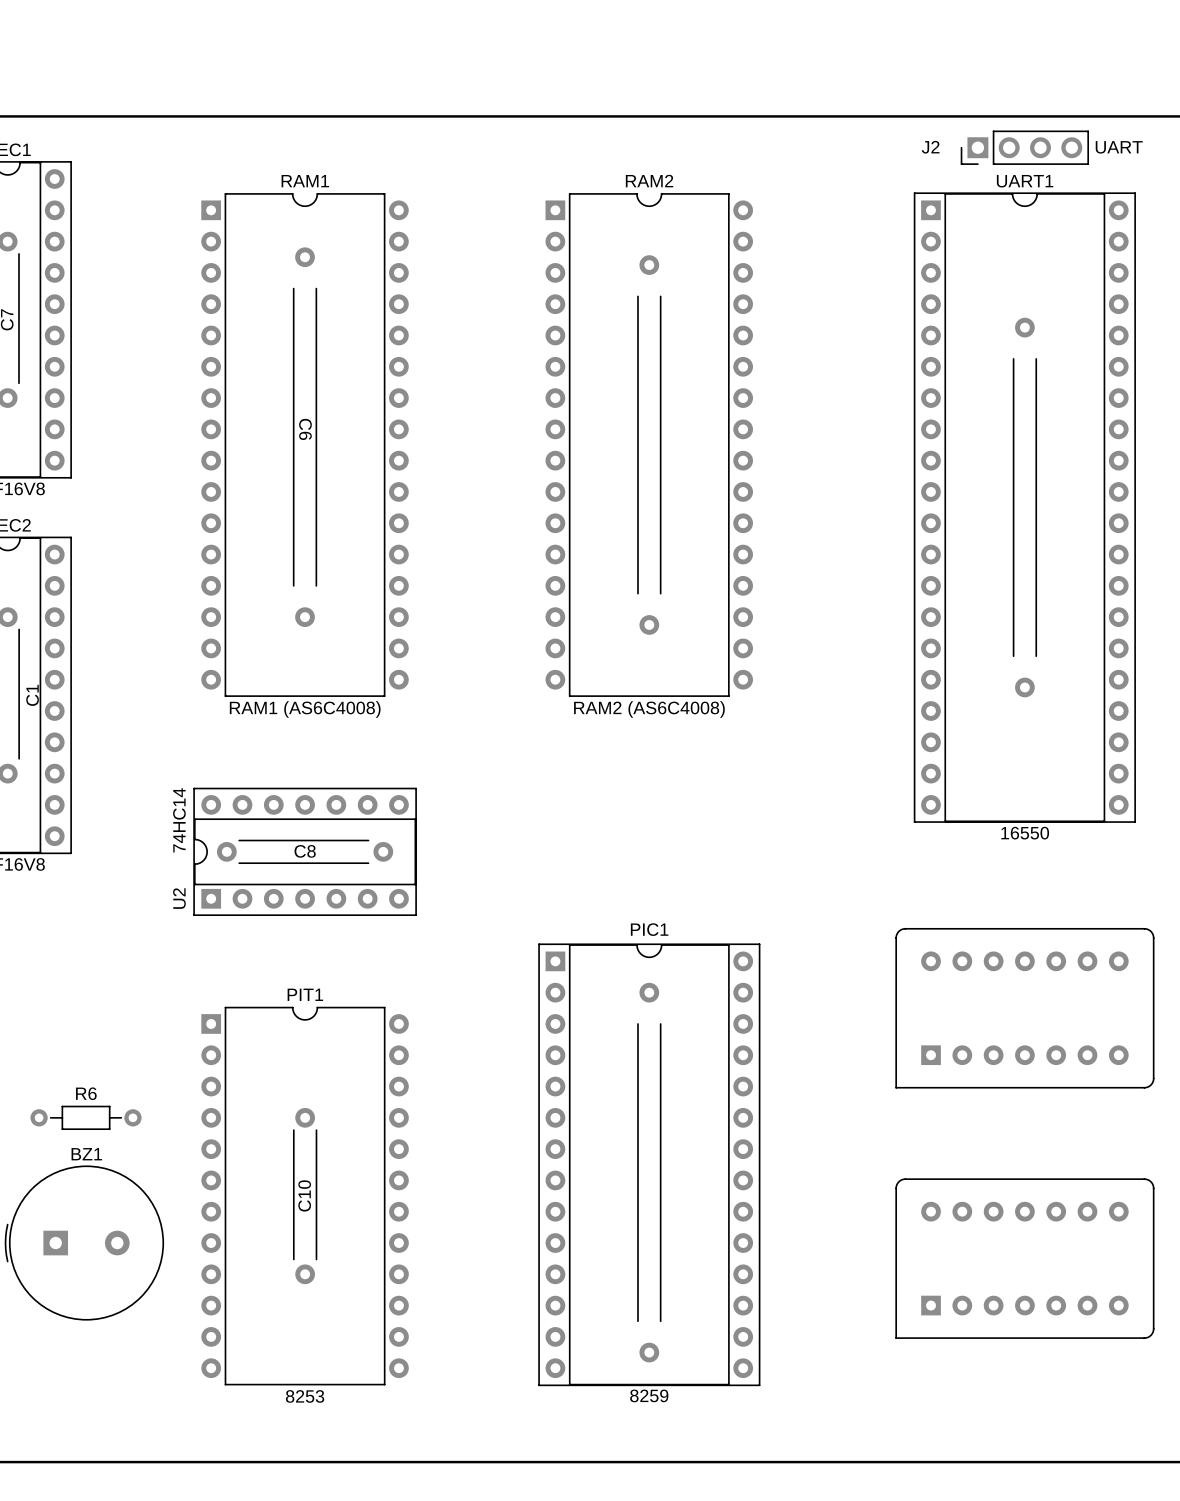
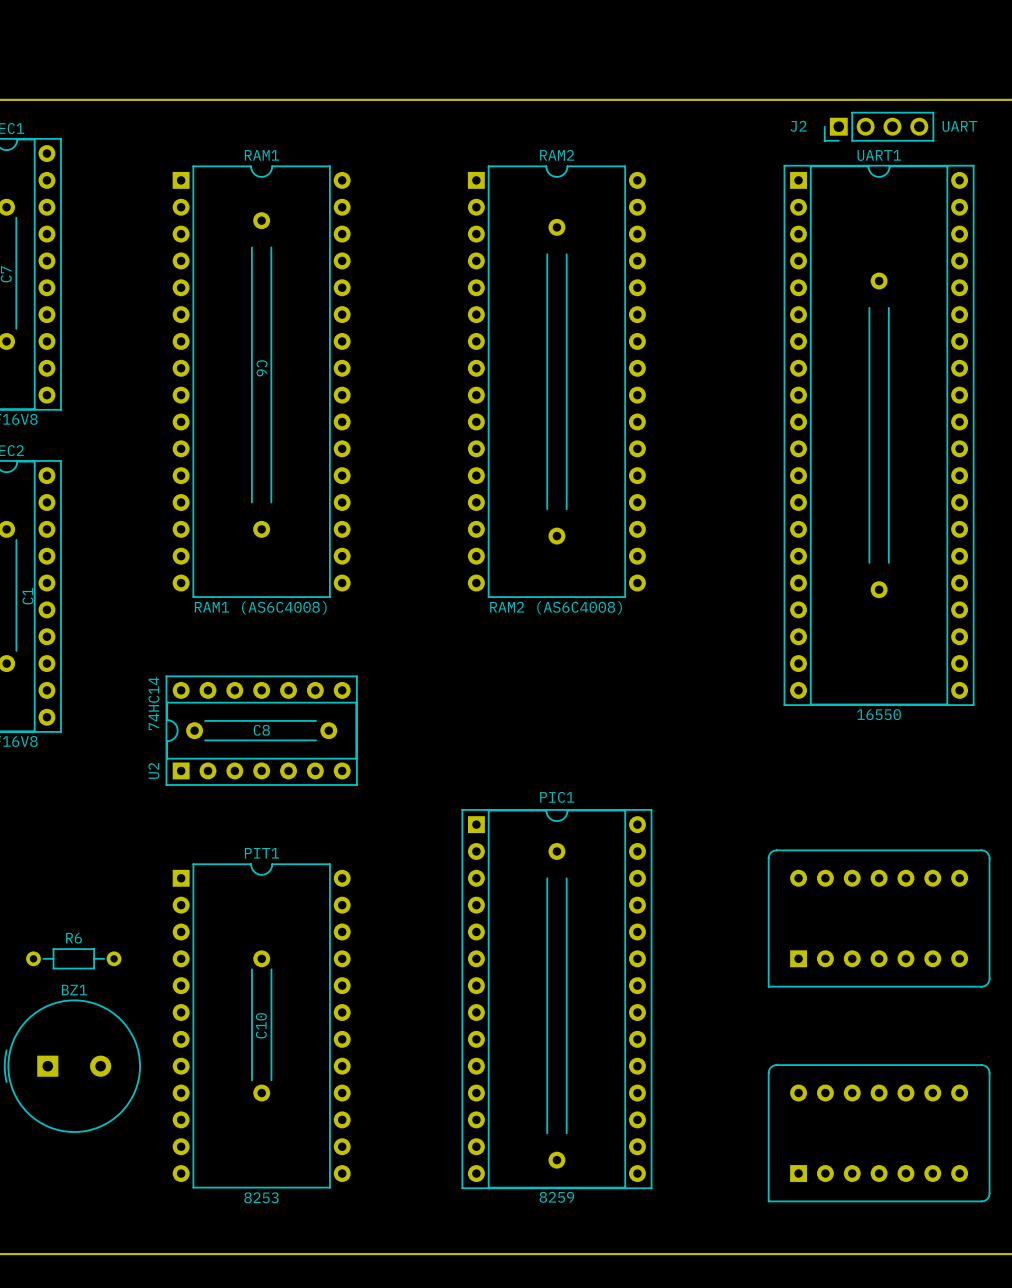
part position: (1024, 1008) -> (879, 918)
part position: (1024, 1258) -> (879, 1133)

